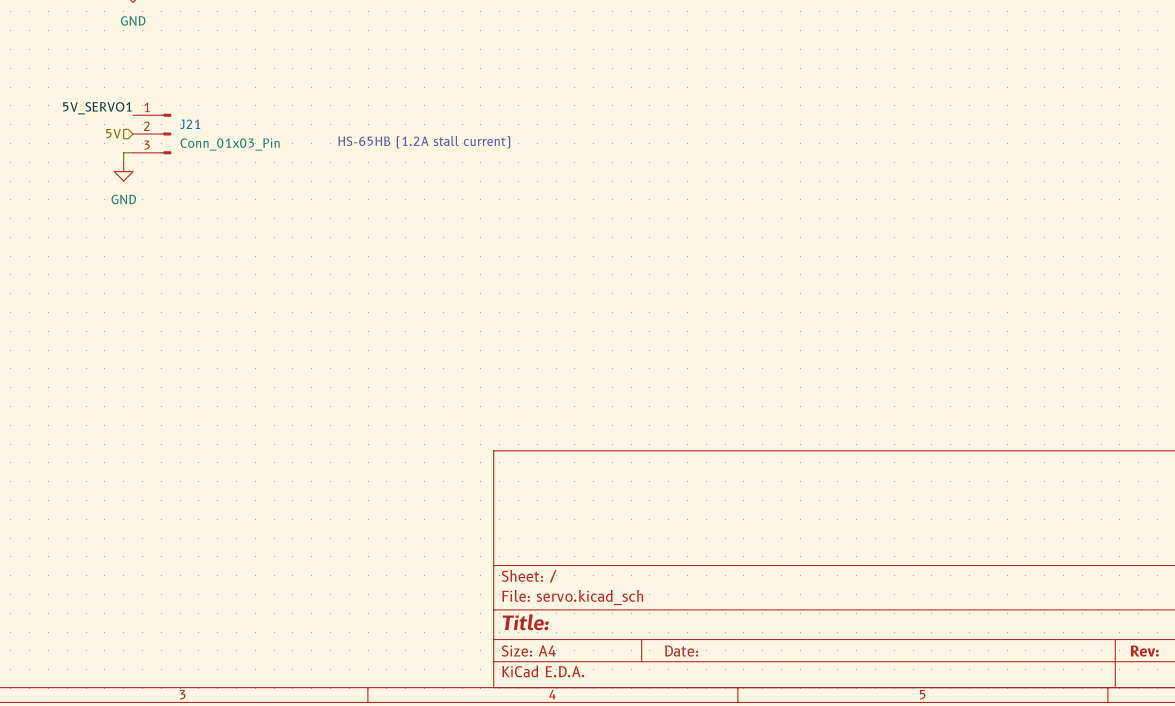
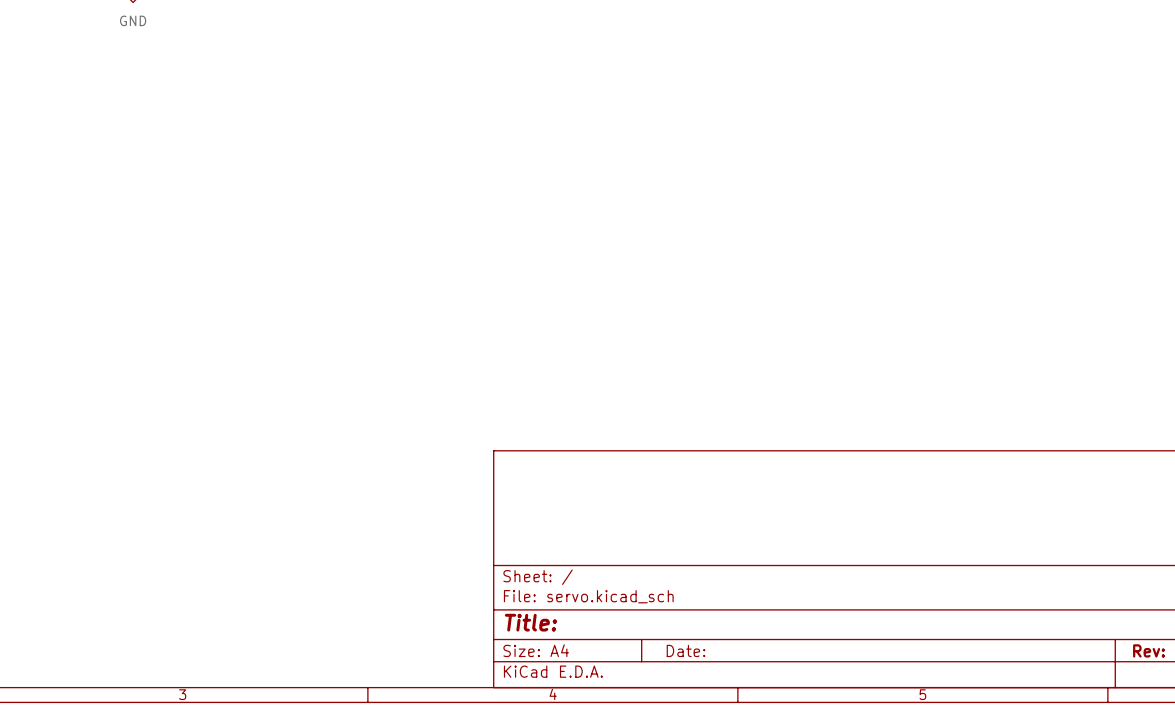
label: 5V_SERVO1 (97, 108) -> none
hierarchical label: 5V (113, 133) -> none
J21: Conn_01x03_Pin (152, 134) -> none
text: HS-65HB (1.2A stall current) (424, 142) -> none
wire: (133, 152) (123, 152) (123, 162) -> none
power symbol: GND (123, 171) -> none

